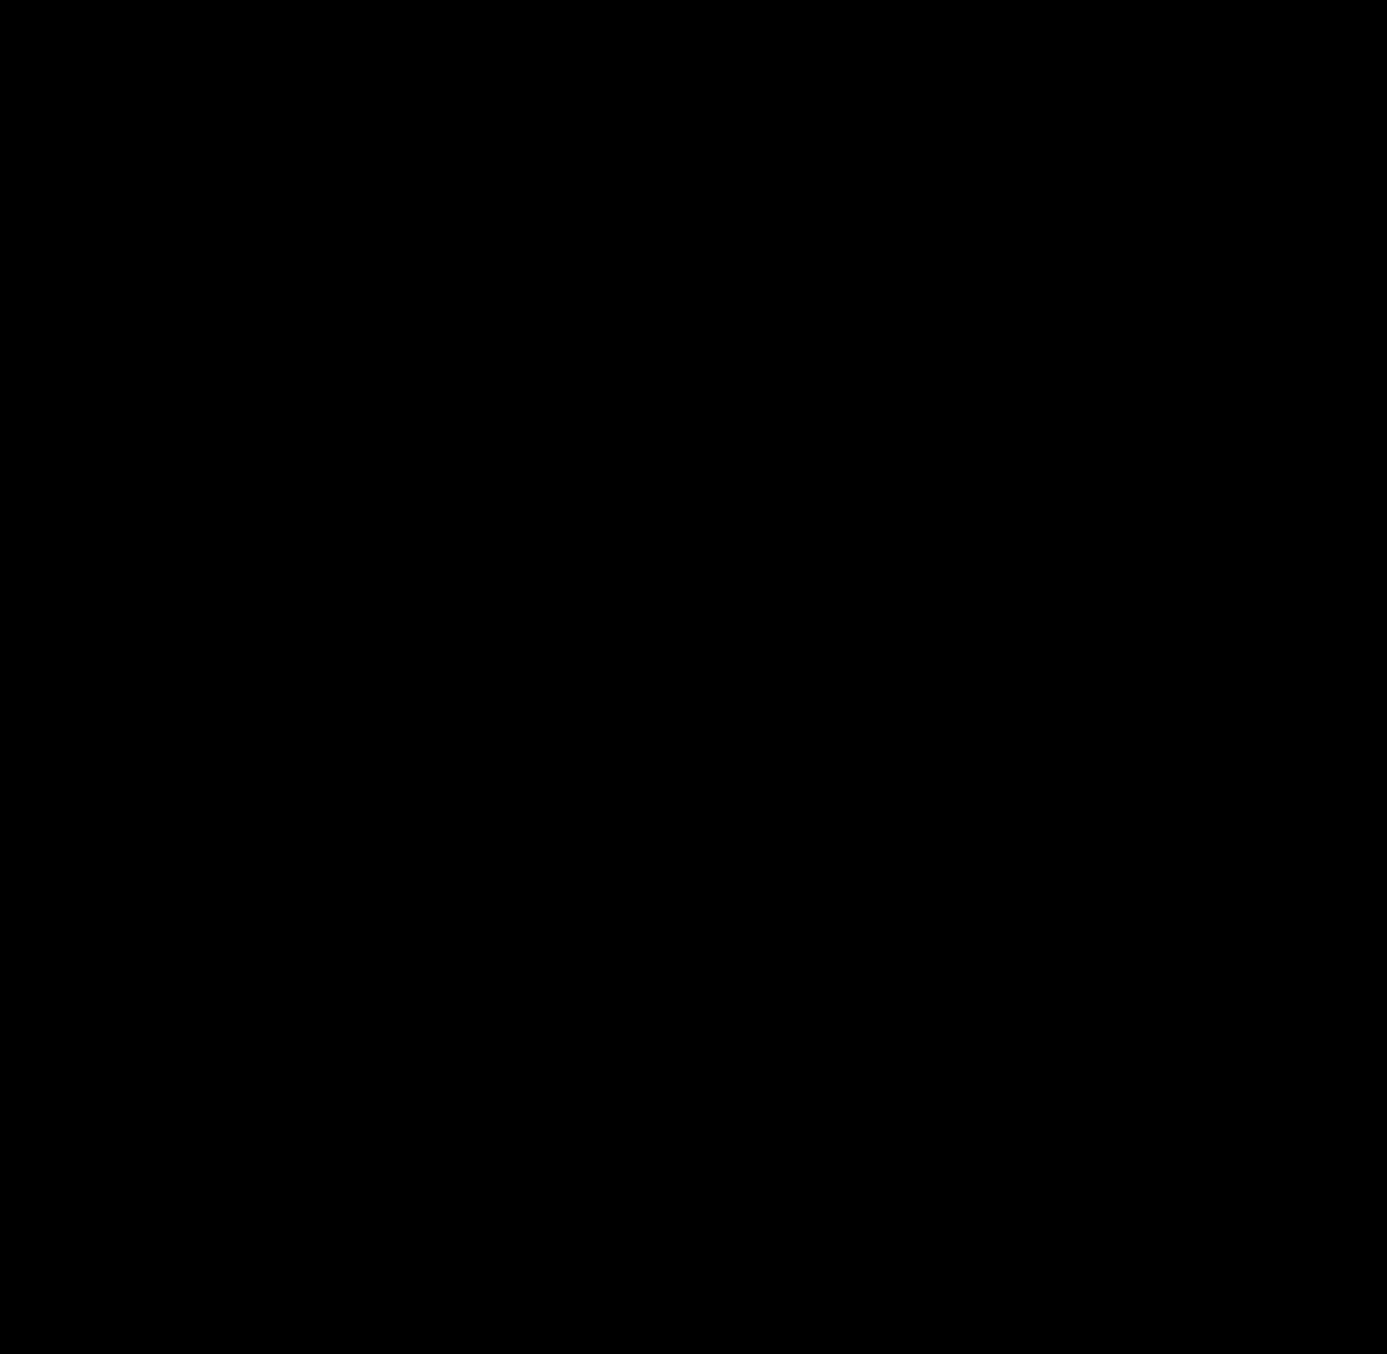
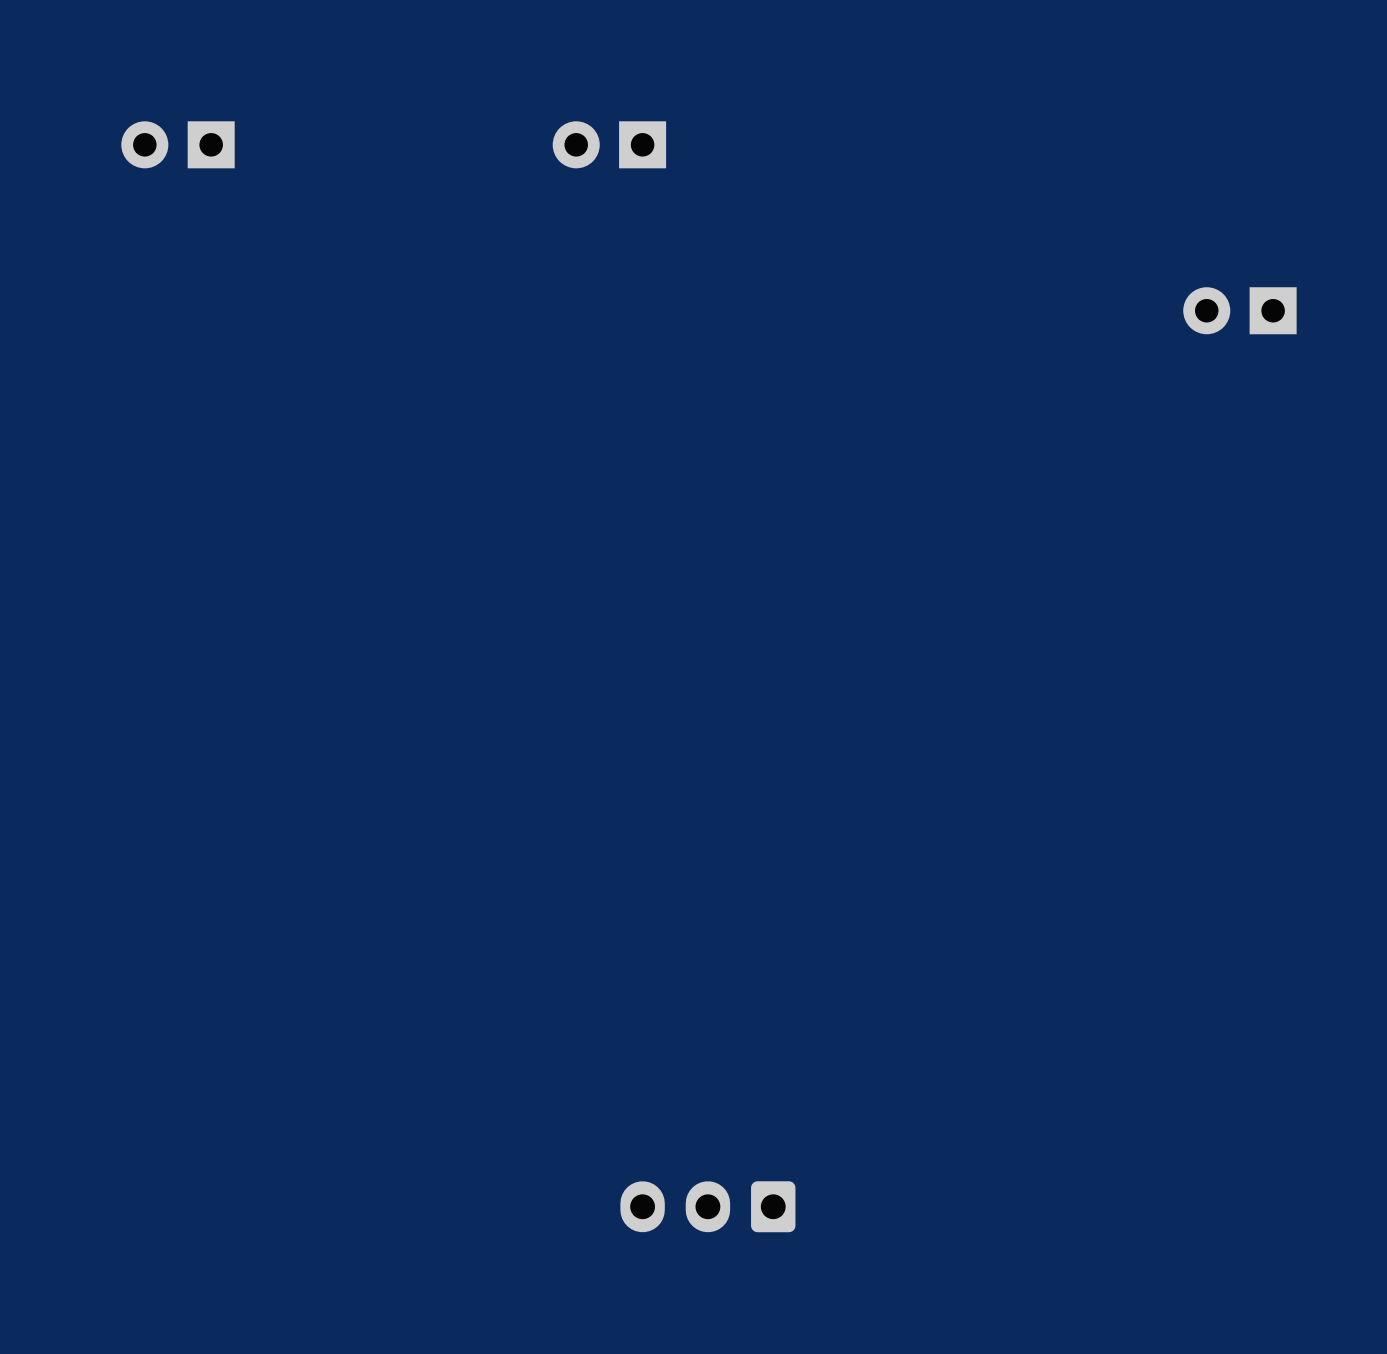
part: none -> (178, 144)
part: none -> (609, 144)
part: none -> (1239, 310)
part: none -> (707, 1206)

